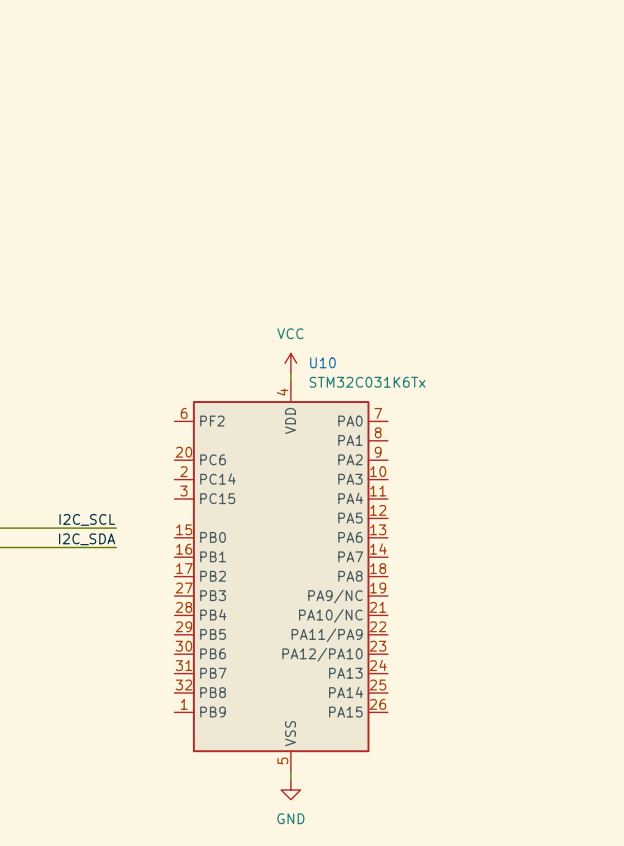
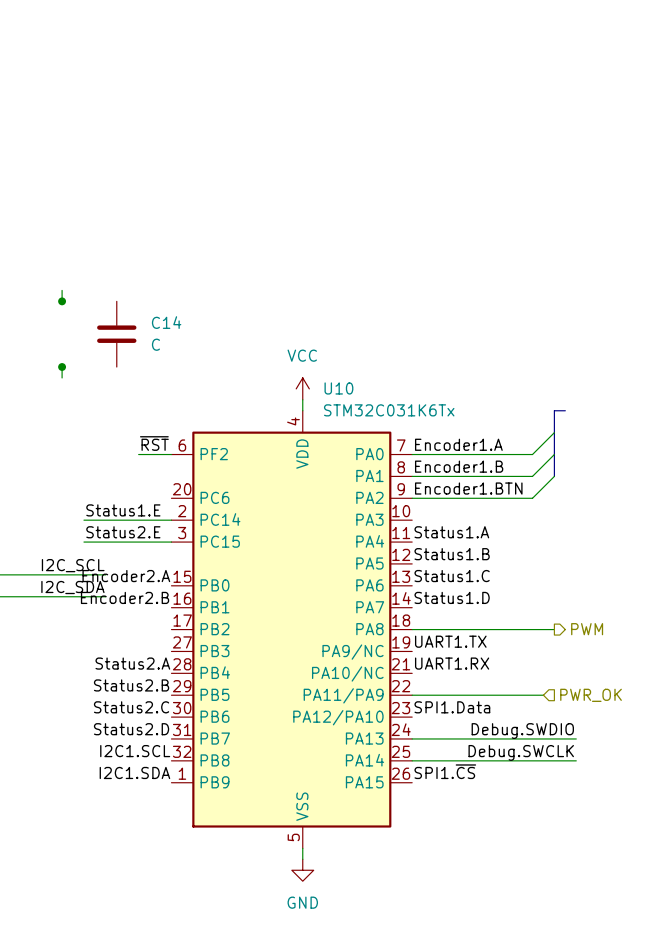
wire: none -> (62, 290) (62, 301)
junction: none -> (62, 301)
C14: none -> C (116, 334)
wire: none -> (62, 367) (62, 377)
junction: none -> (62, 367)
bus: none -> (565, 410) (554, 410) (554, 476)
wire: none -> (554, 432) (532, 454) (412, 454)
label: none -> ~{RST} (154, 443)
label: none -> Encoder1.A (458, 444)
wire: none -> (138, 454) (171, 454)
wire: none -> (554, 454) (532, 476) (412, 476)
label: none -> Encoder1.B (459, 466)
wire: none -> (554, 476) (532, 498) (412, 498)
label: none -> Encoder1.BTN (468, 488)
label: none -> Status1.E (123, 510)
wire: none -> (83, 520) (171, 520)
label: none -> Status2.E (123, 532)
label: none -> Status1.A (451, 532)
wire: none -> (83, 542) (171, 542)
label: none -> Status1.B (452, 554)
label: none -> Encoder2.A (126, 576)
label: none -> Status1.C (452, 576)
label: none -> Encoder2.B (125, 597)
label: none -> Status1.D (452, 597)
wire: none -> (412, 629) (554, 629)
hierarchical label: none -> PWM (587, 629)
label: none -> UART1.TX (450, 641)
label: none -> Status2.A (132, 663)
label: none -> UART1.RX (452, 663)
label: none -> Status2.B (131, 685)
wire: none -> (412, 695) (543, 695)
hierarchical label: none -> PWR_OK (591, 695)
label: none -> Status2.C (131, 707)
label: none -> SPI1.Data (452, 707)
label: none -> Status2.D (131, 729)
label: none -> Debug.SWDIO (522, 731)
wire: none -> (412, 738) (576, 738)
label: none -> I2C1.SCL (135, 751)
label: none -> Debug.SWCLK (521, 752)
wire: none -> (412, 760) (576, 760)
label: none -> SPI1.~{CS} (445, 771)
label: none -> I2C1.SDA (134, 772)

